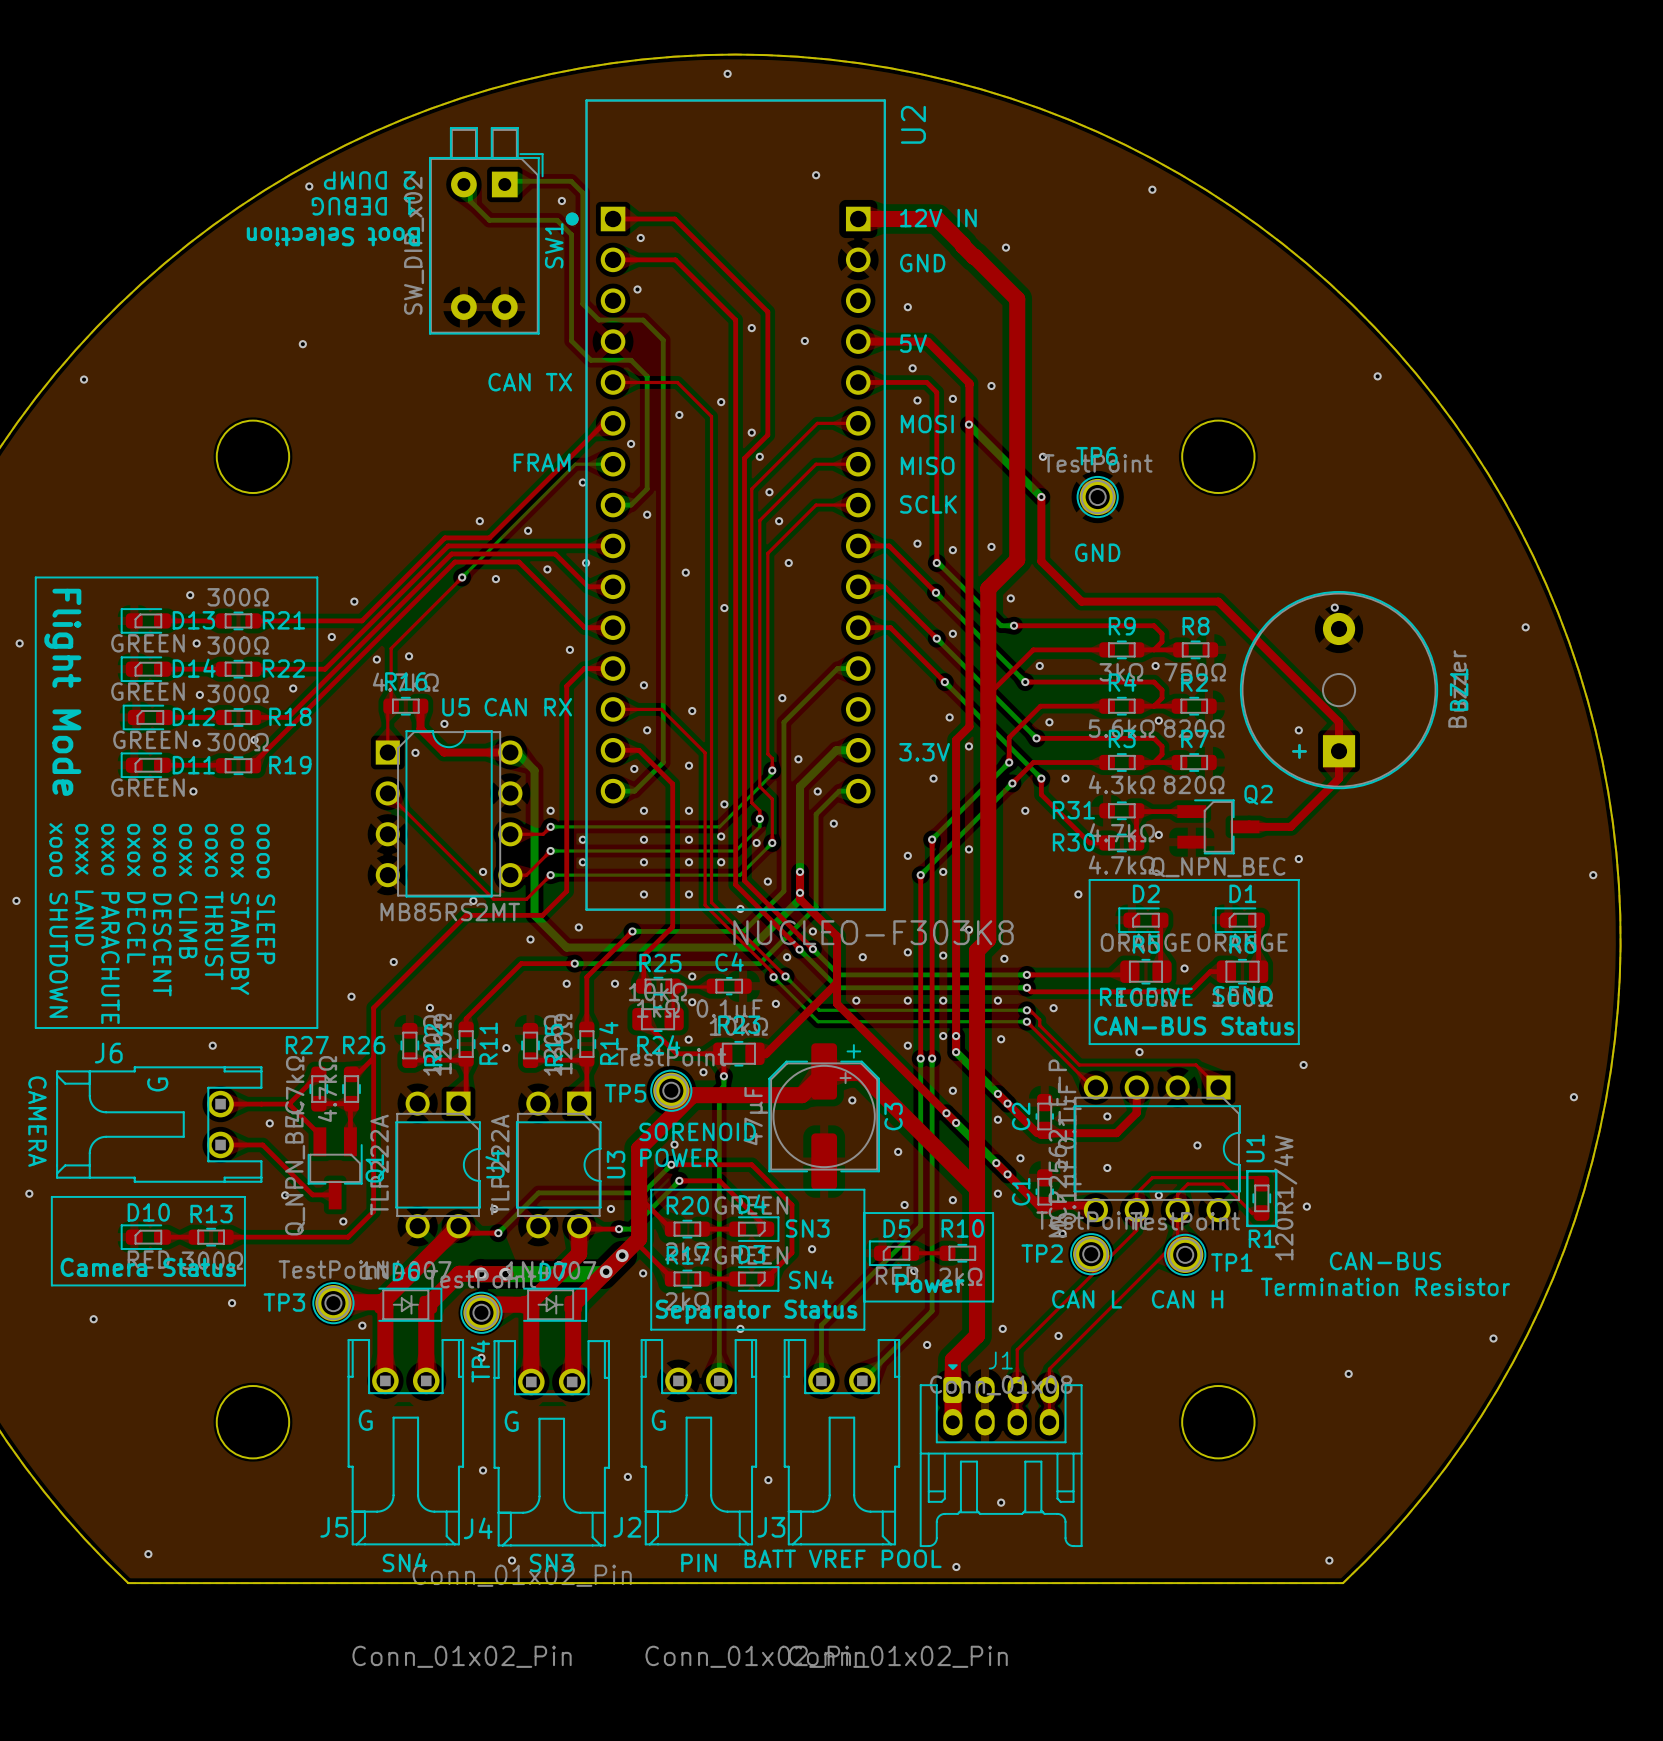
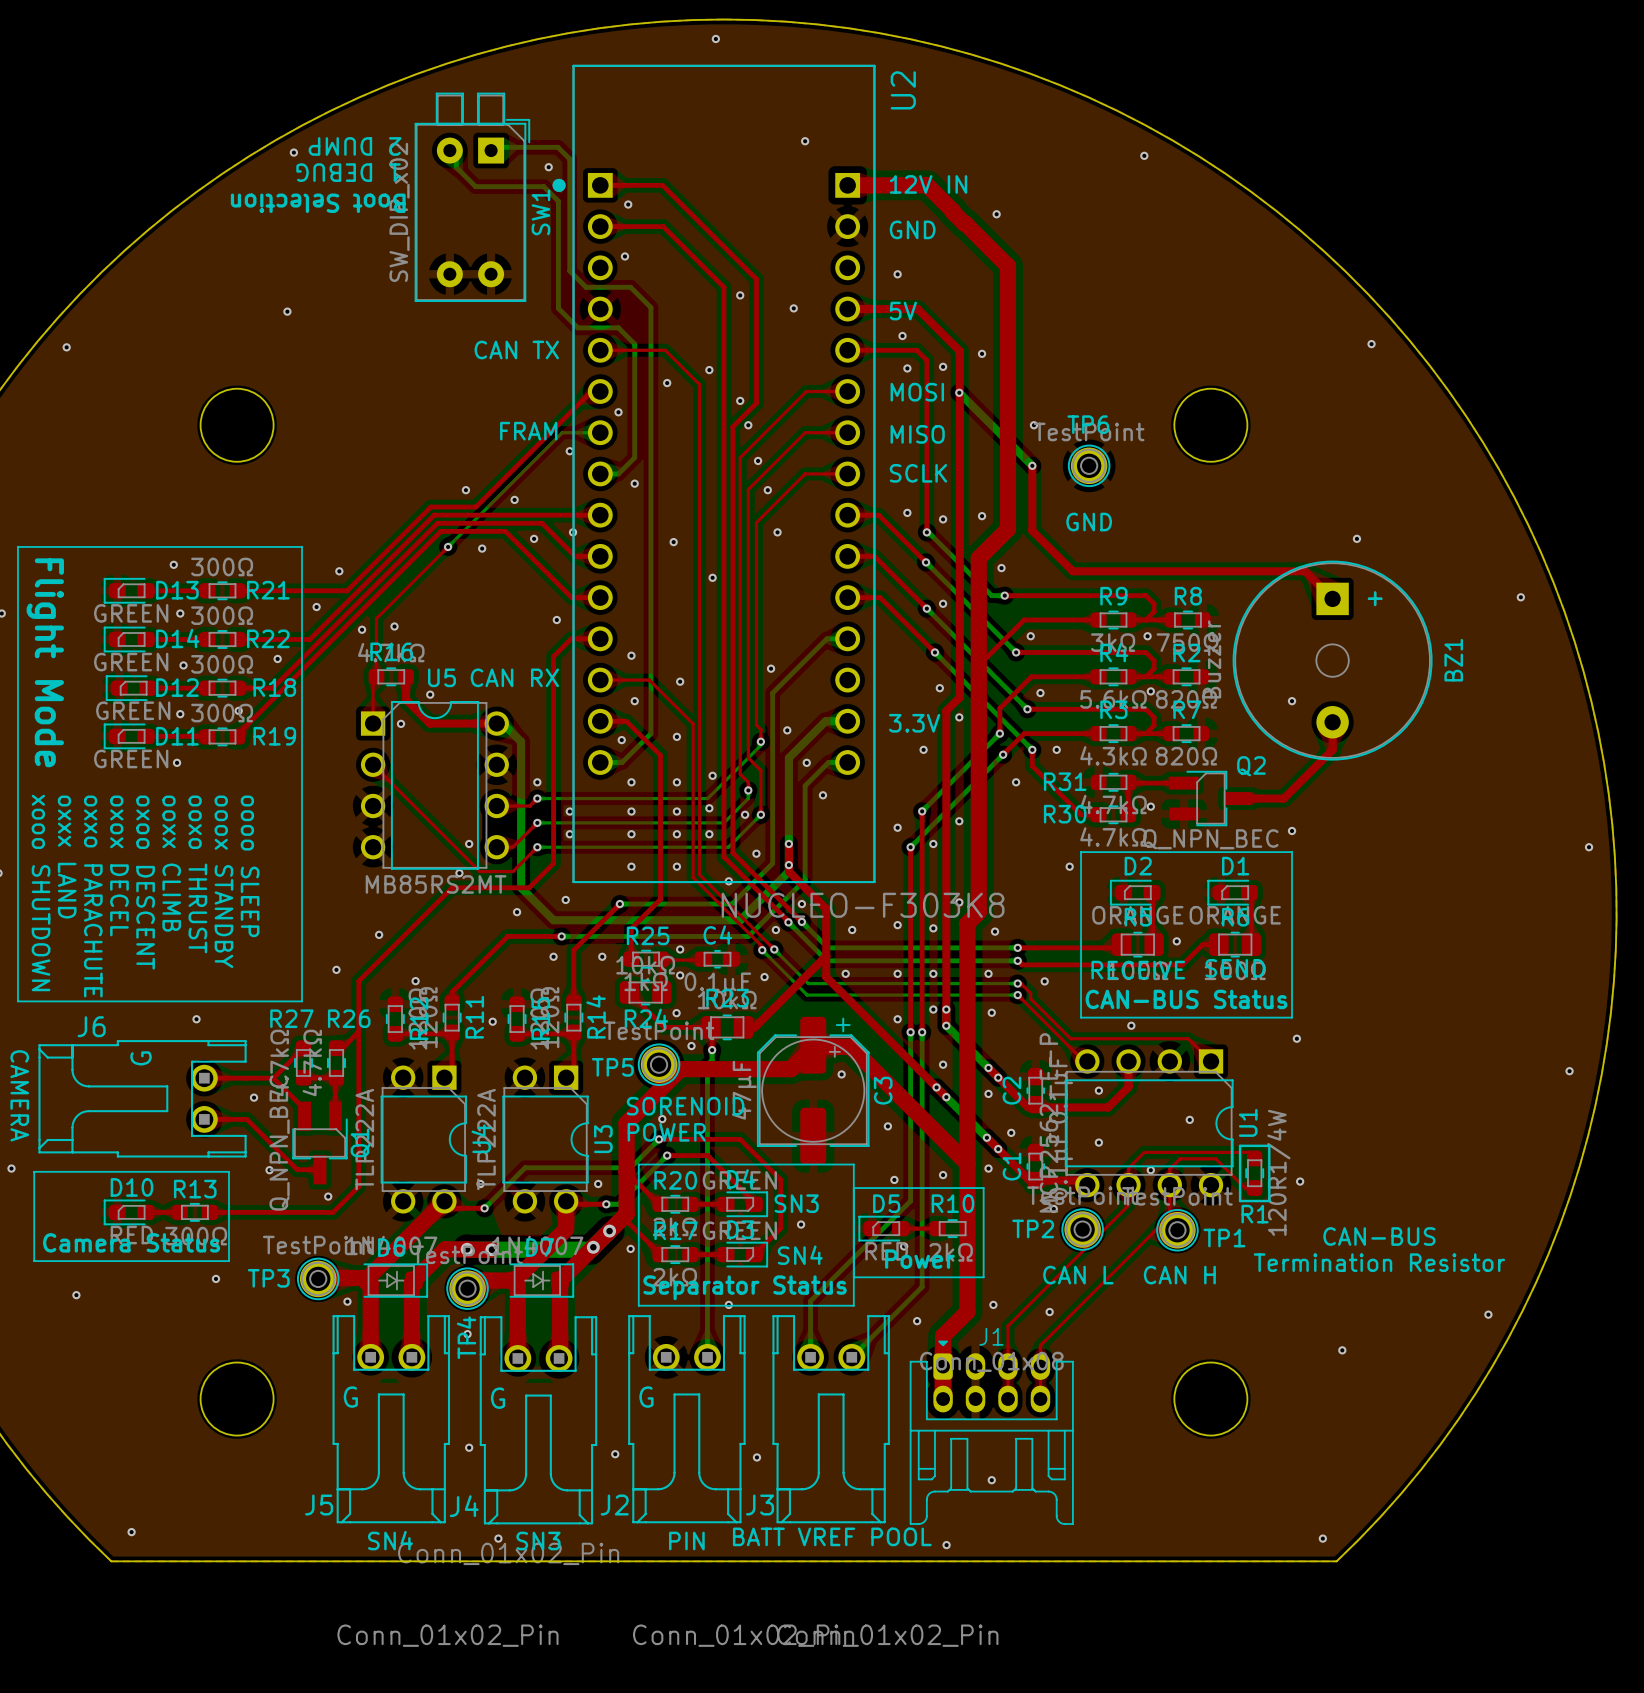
top track: (1218, 601) (1339, 722) (1339, 751) -> (1210, 571) (1305, 571) (1332, 598)
via position: (1334, 607) -> (1356, 538)
BZ1 rotation: 0° (1339, 690) -> 180° (1332, 660)

